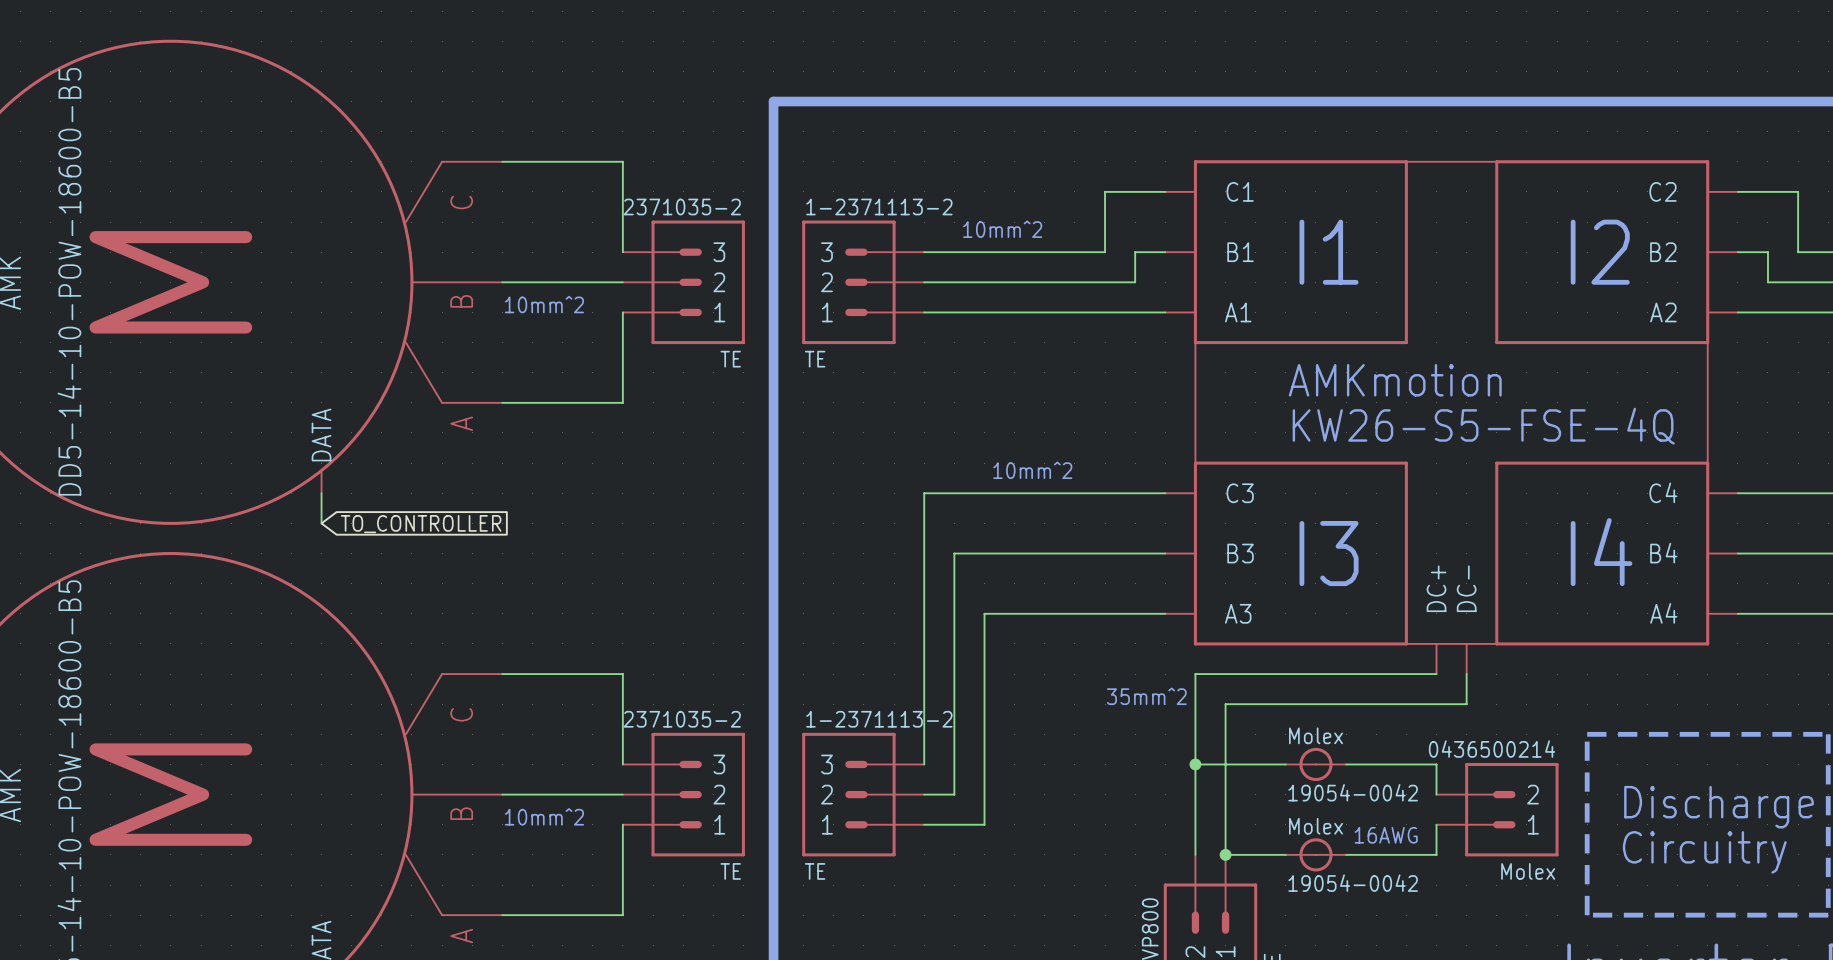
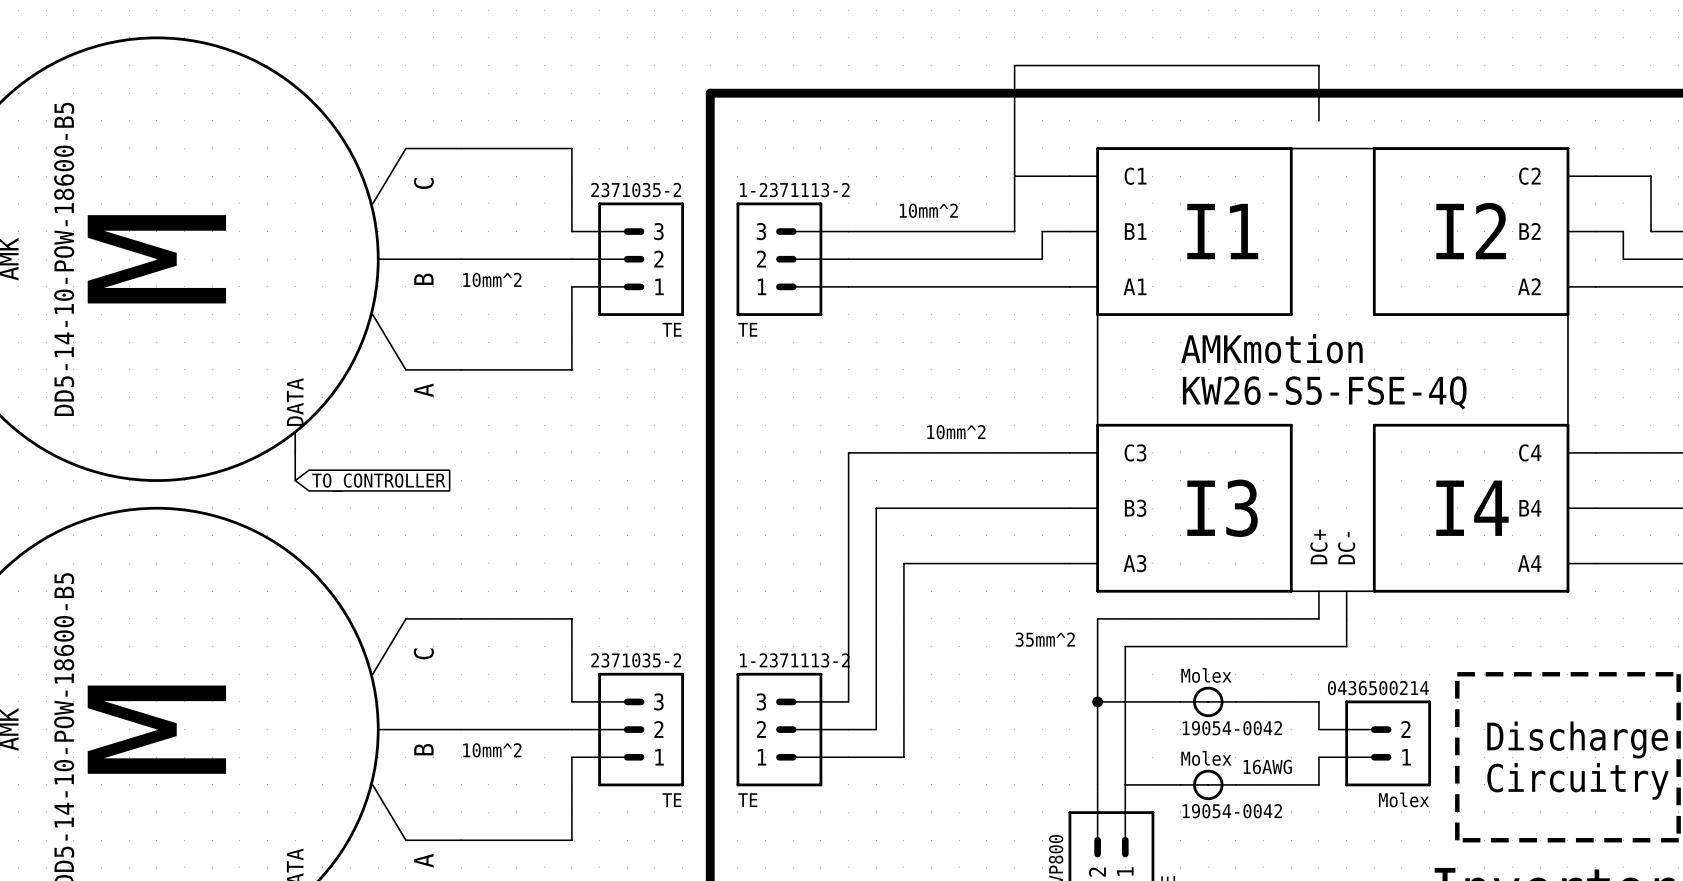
wire: none -> (1318, 120) (1318, 65) (1014, 65) (1014, 176)
junction: (1225, 854) -> none

